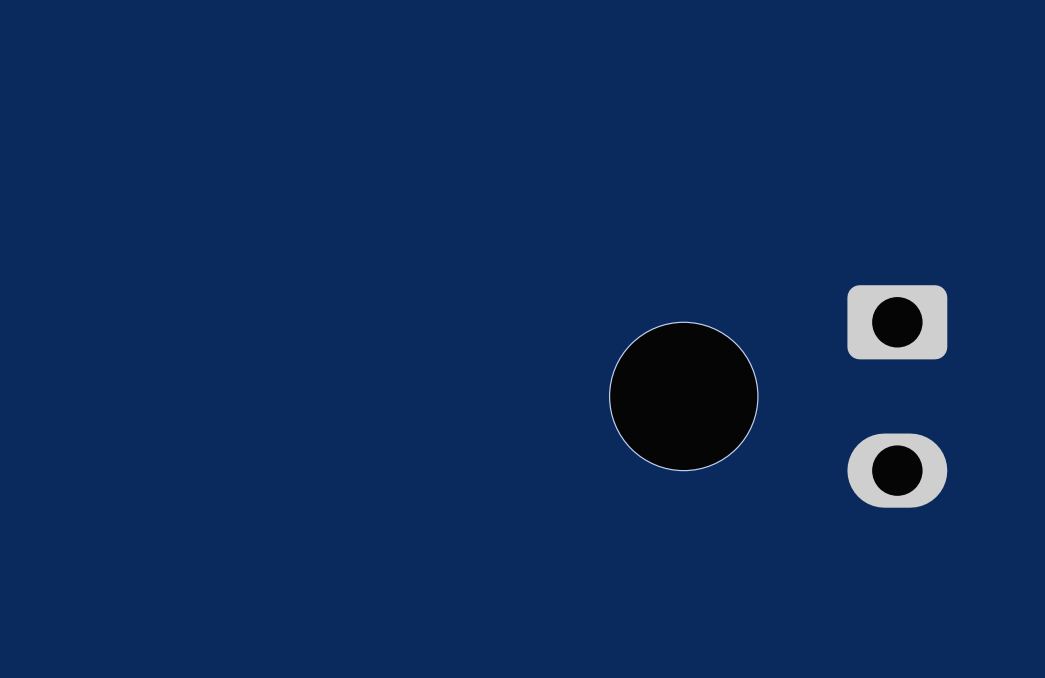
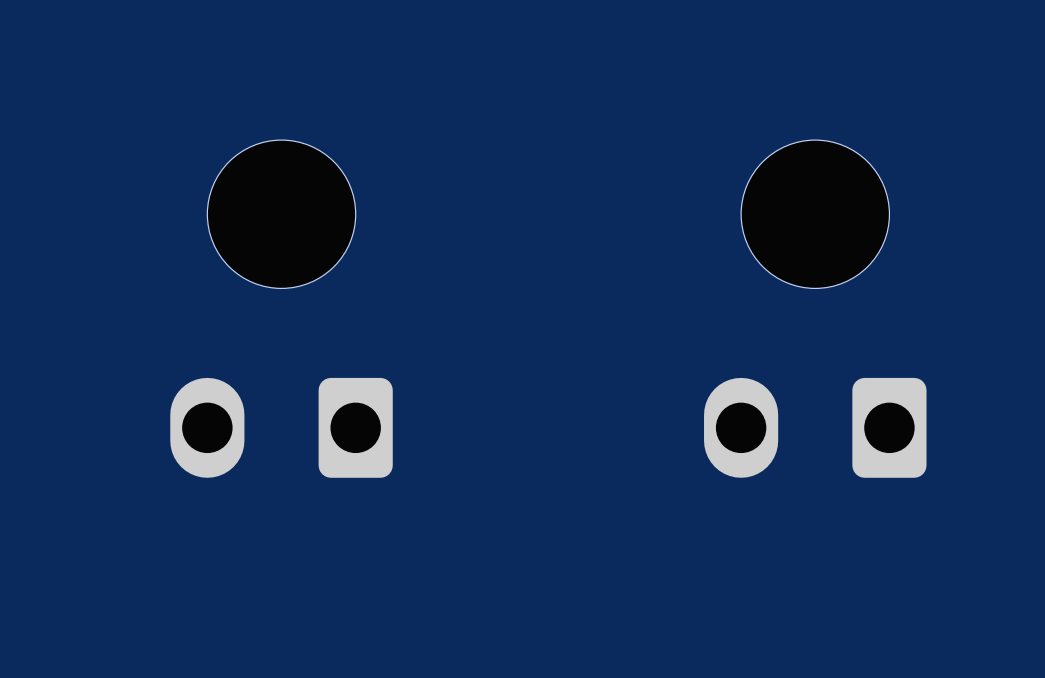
part: none -> (281, 308)
part rotation: 0° (778, 396) -> 90° clockwise (815, 308)

